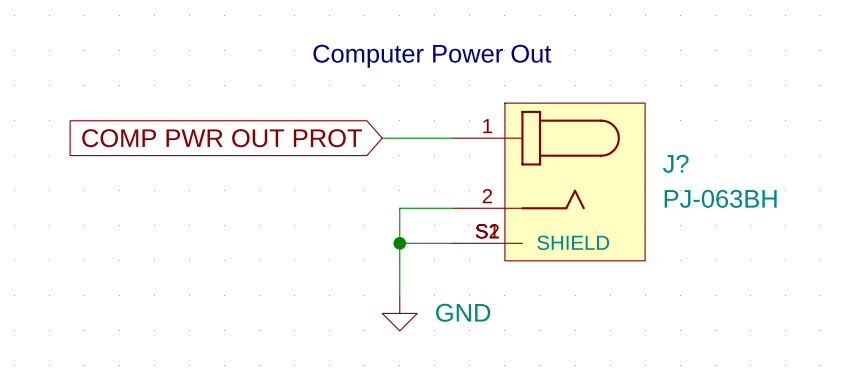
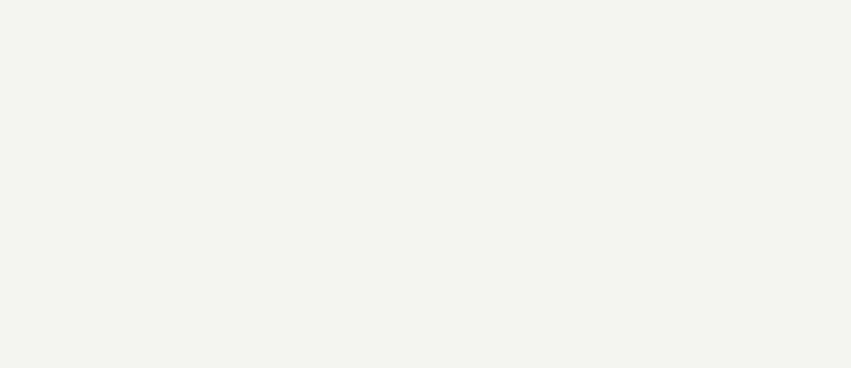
text: Computer Power Out (432, 56) -> none
global label: COMP PWR OUT PROT (222, 138) -> none
wire: (382, 138) (452, 138) -> none
J?: PJ-063BH (548, 181) -> none
wire: (452, 208) (399, 208) (399, 295) -> none
wire: (399, 243) (452, 243) -> none
junction: (399, 243) -> none
power symbol: GND (399, 313) -> none

